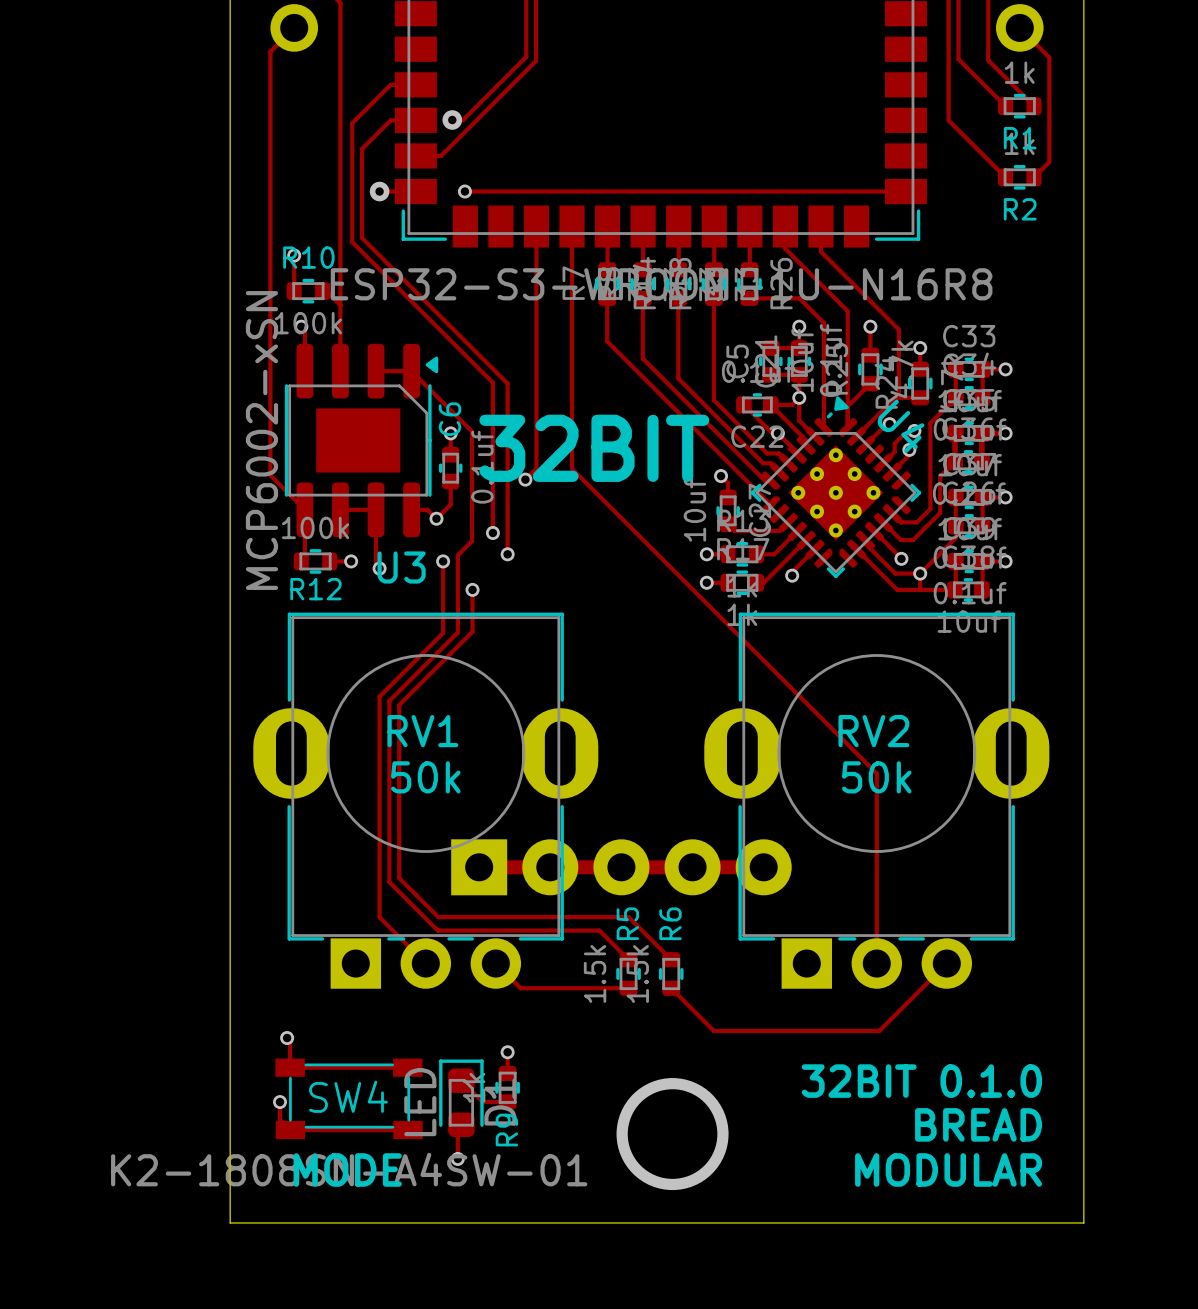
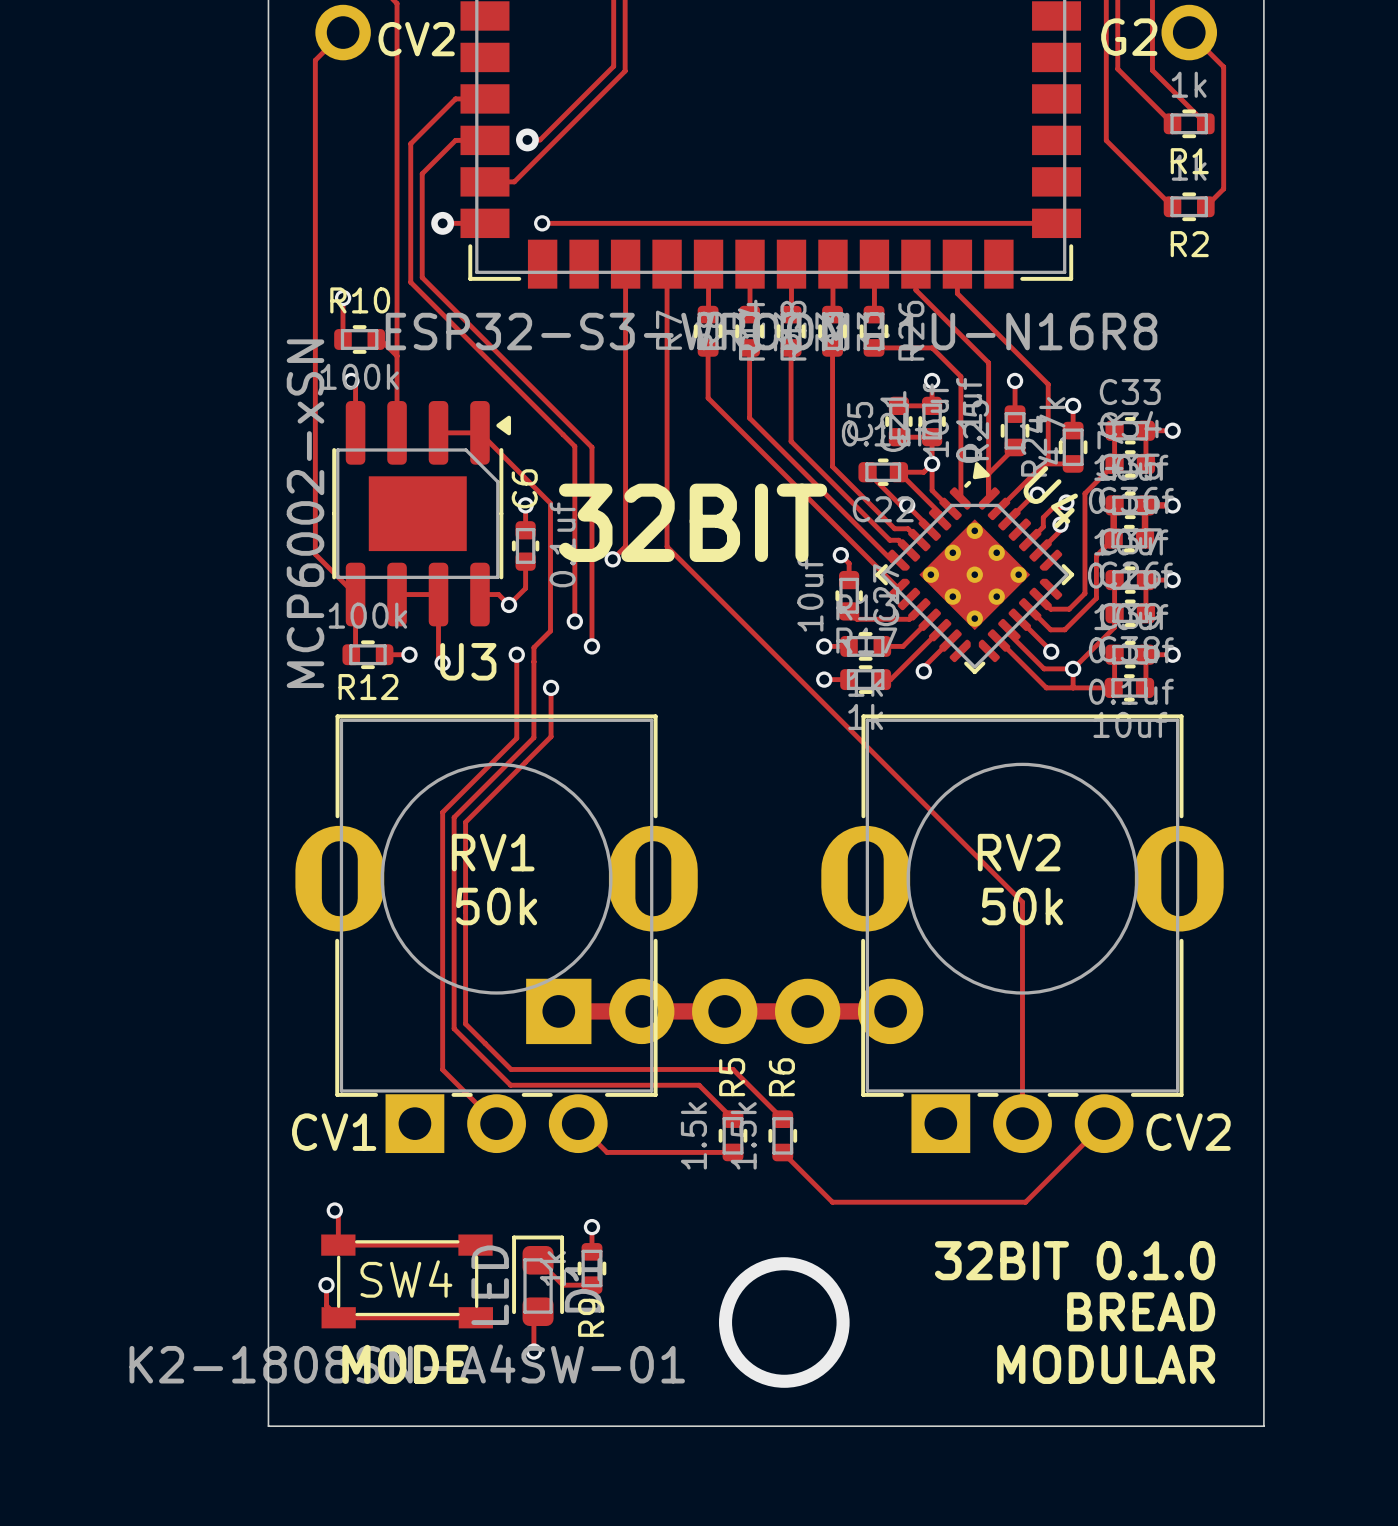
text: none -> G2 (1129, 37)
text: none -> CV2 (416, 39)
text: none -> CV1 (334, 1132)
text: none -> CV2 (1188, 1132)

